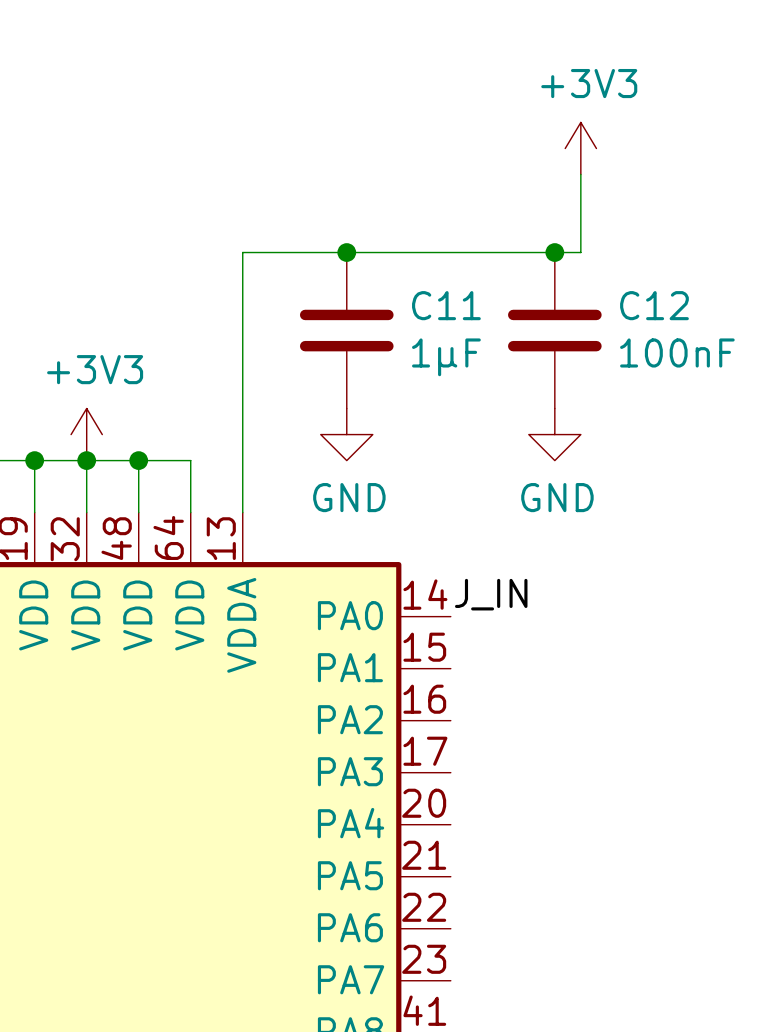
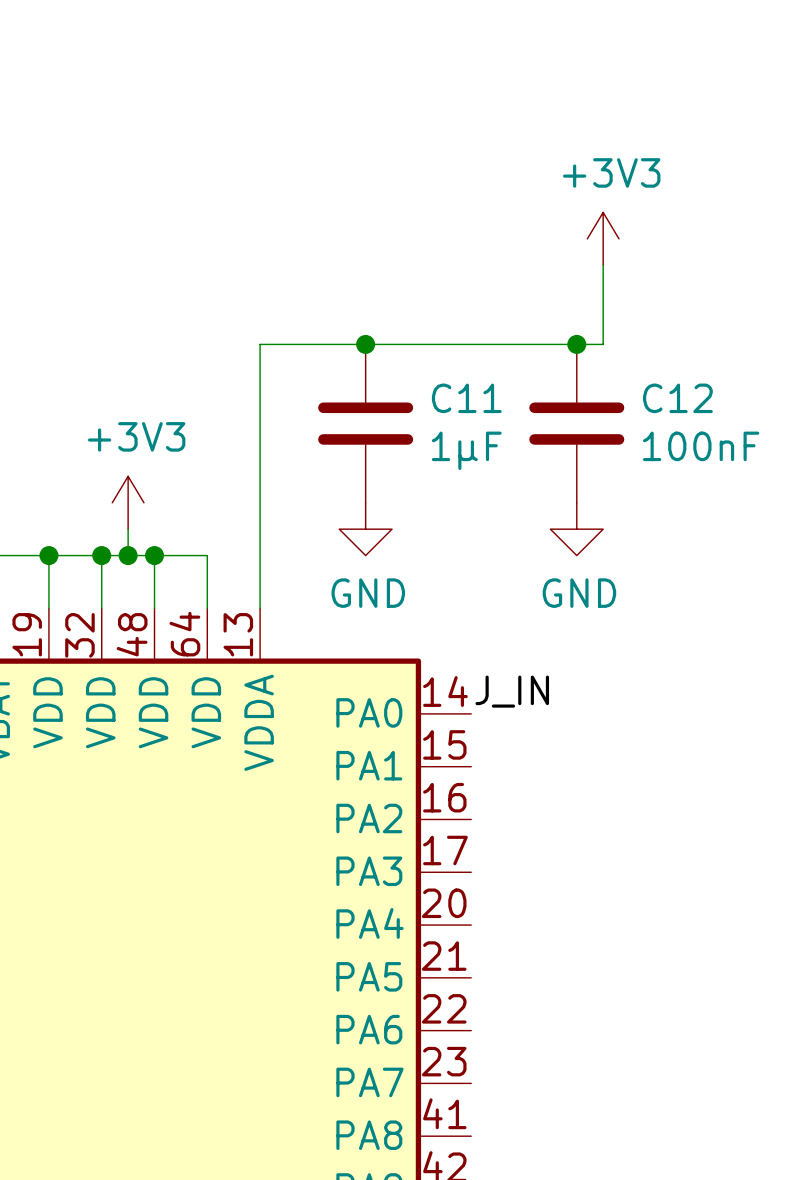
power symbol position: +3V3 (86, 434) -> +3V3 (128, 502)
wire: none -> (128, 529) (128, 555)
junction: none -> (128, 555)

